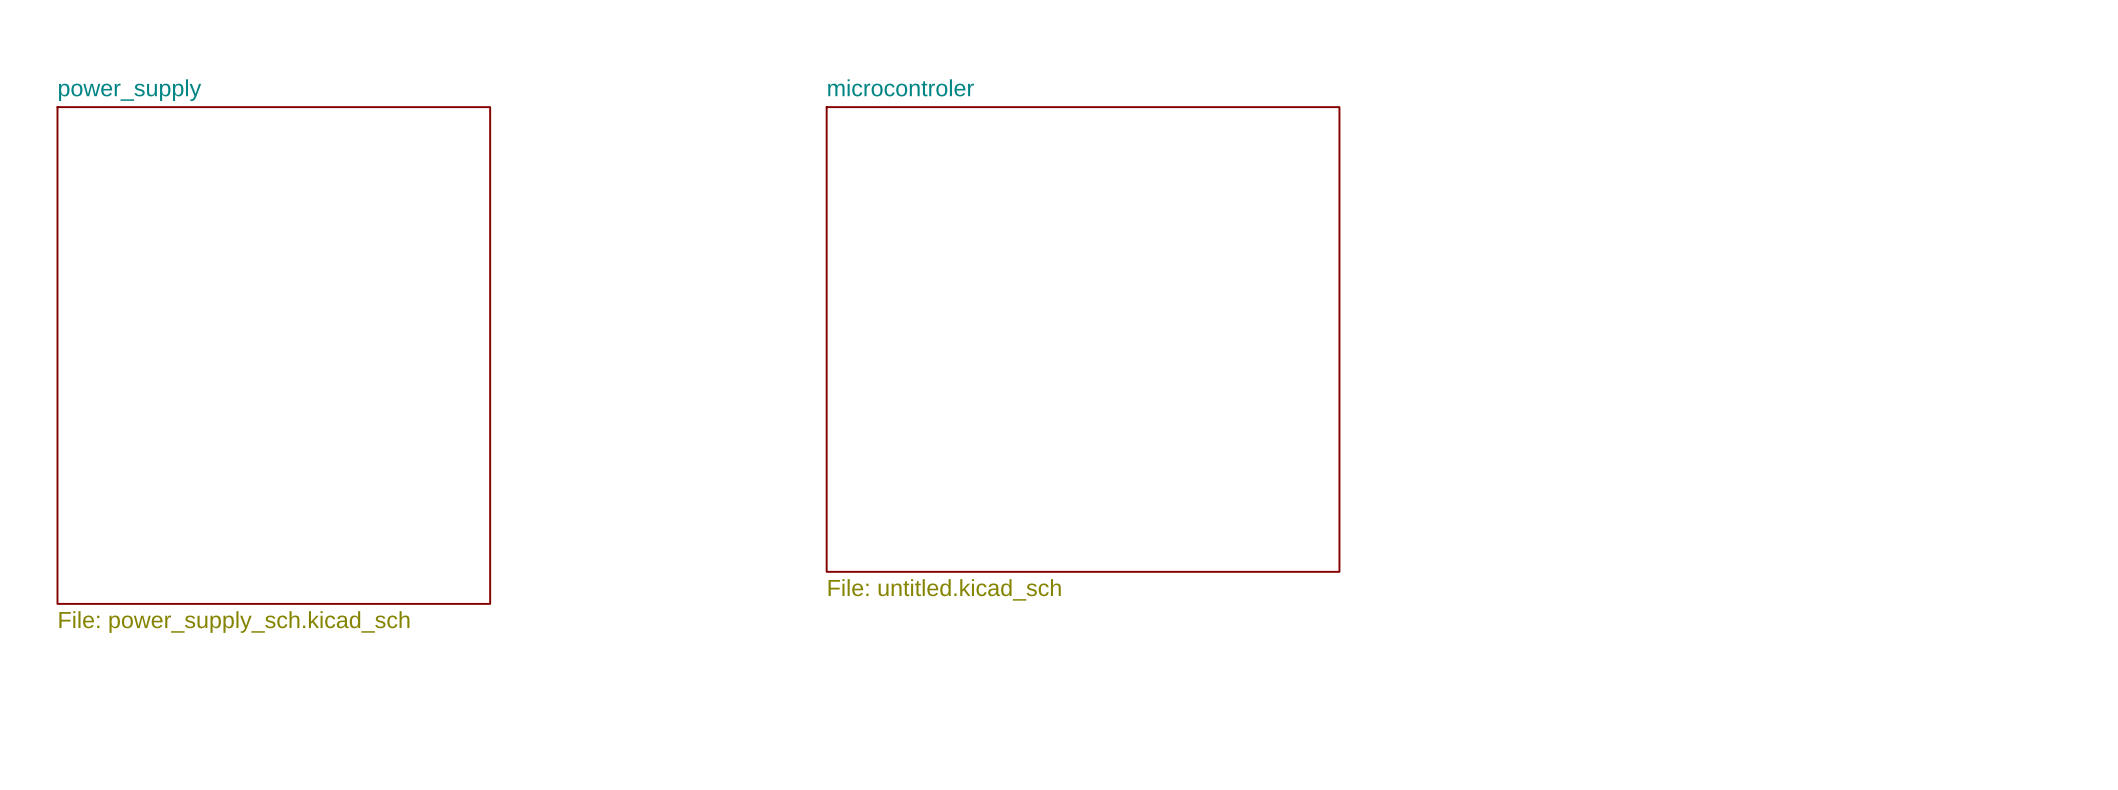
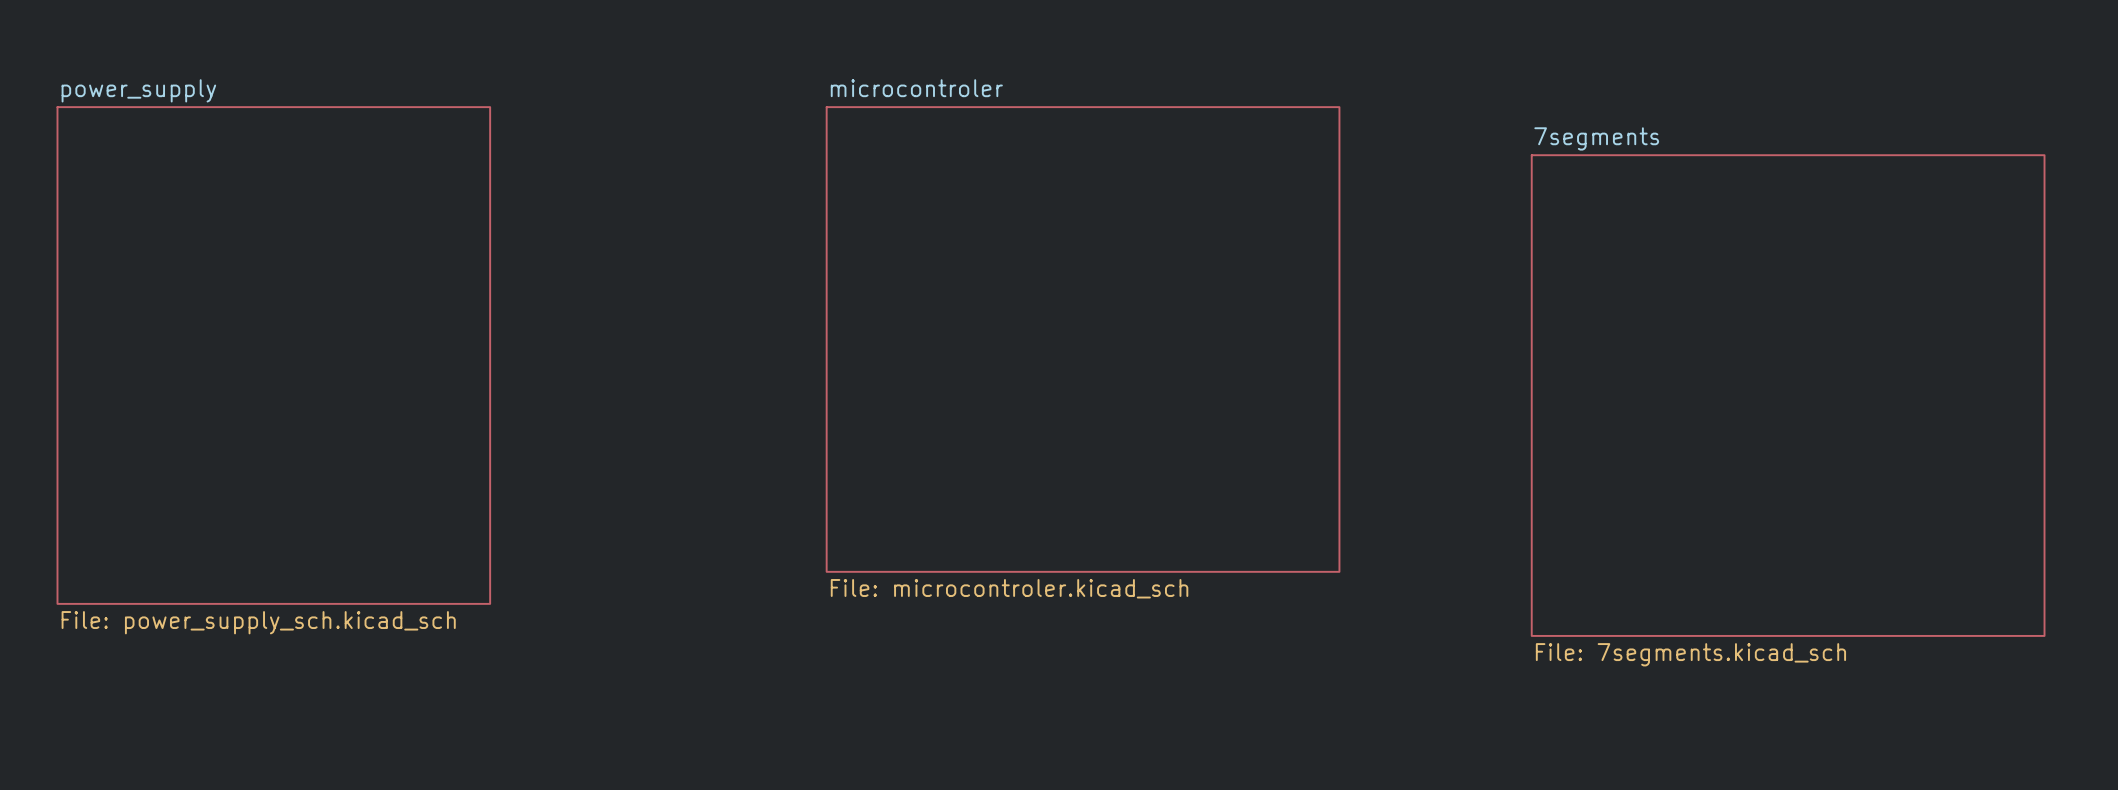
sheet 7segments: none -> File: 7segments.kicad_sch (1788, 395)
sheet microcontroler value: File: untitled.kicad_sch (944, 589) -> File: microcontroler.kicad_sch (1009, 588)

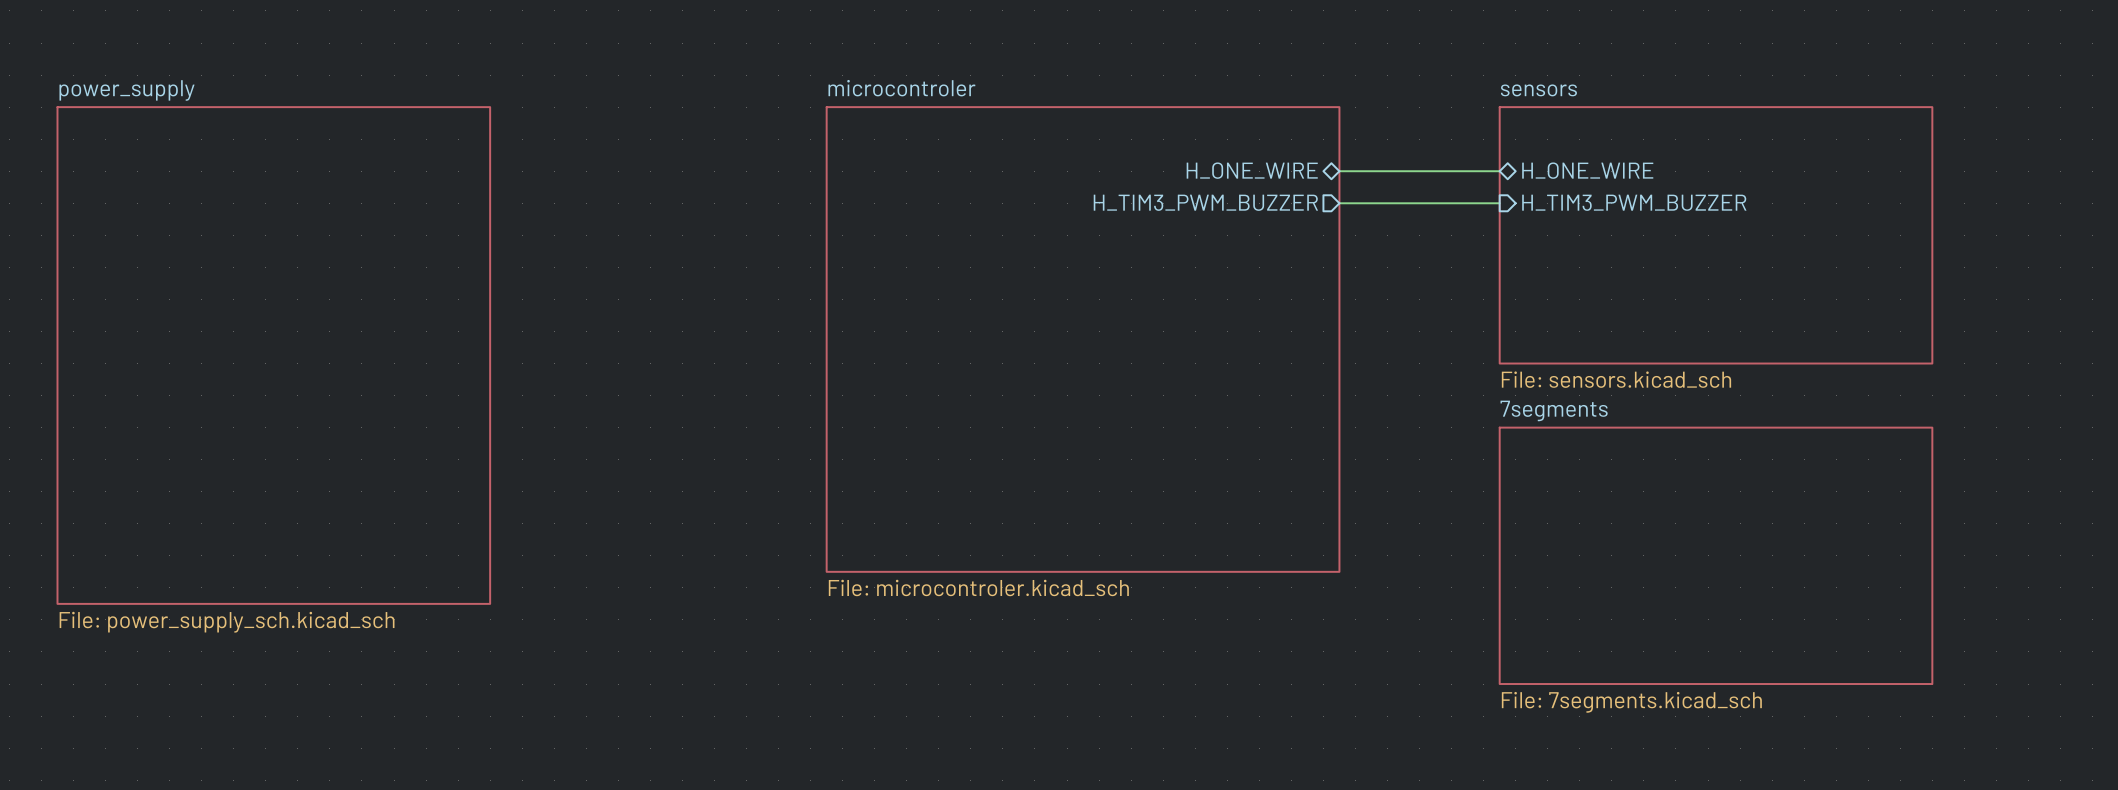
sheet 7segments name position: 7segments (1596, 138) -> 7segments (1554, 410)
sheet 7segments shape: [1530, 154, 2046, 637] -> [1498, 426, 1934, 685]
sheet pin: none -> H_ONE_WIRE (1252, 170)
wire: none -> (1339, 171) (1499, 171)
sheet pin: none -> H_ONE_WIRE (1587, 170)
sheet pin: none -> H_TIM3_PWM_BUZZER (1205, 202)
wire: none -> (1339, 203) (1499, 203)
sheet pin: none -> H_TIM3_PWM_BUZZER (1634, 202)
sheet sensors: none -> File: sensors.kicad_sch (1716, 235)
sheet 7segments value position: File: 7segments.kicad_sch (1690, 654) -> File: 7segments.kicad_sch (1631, 702)

